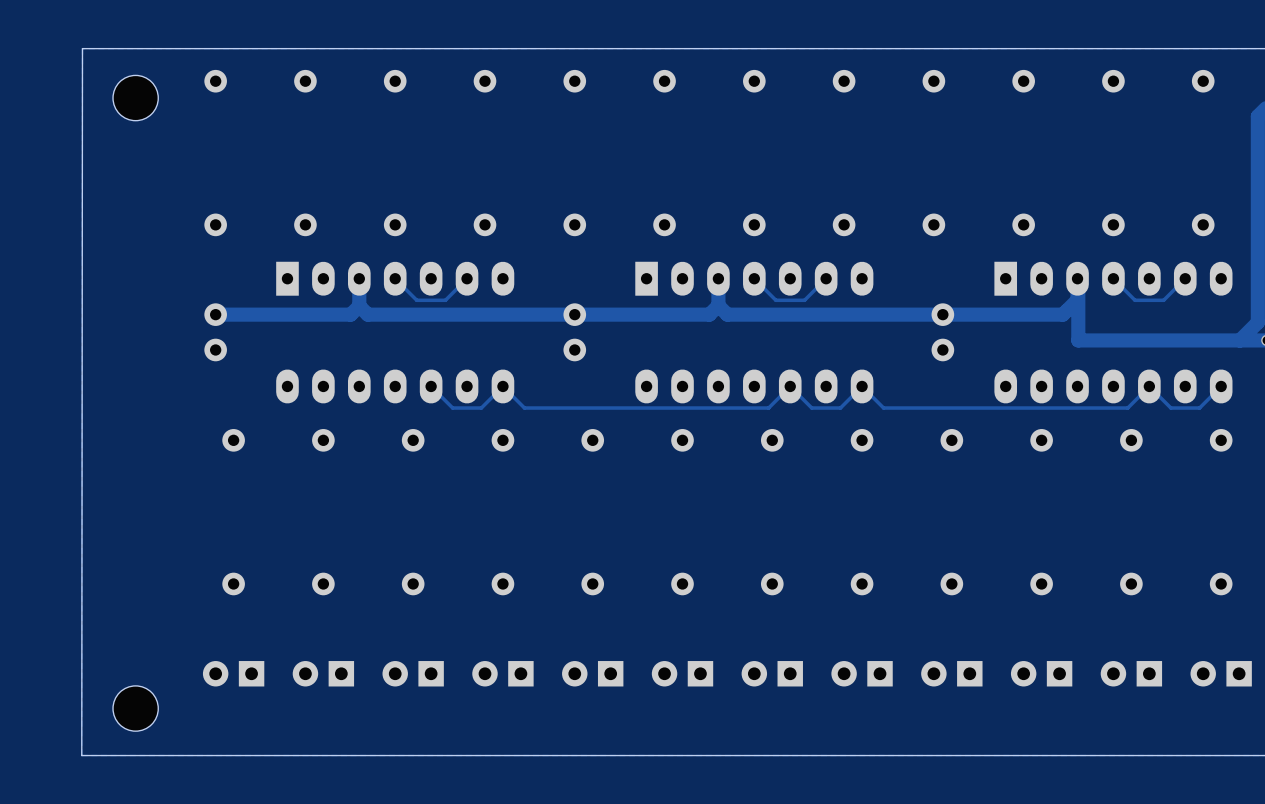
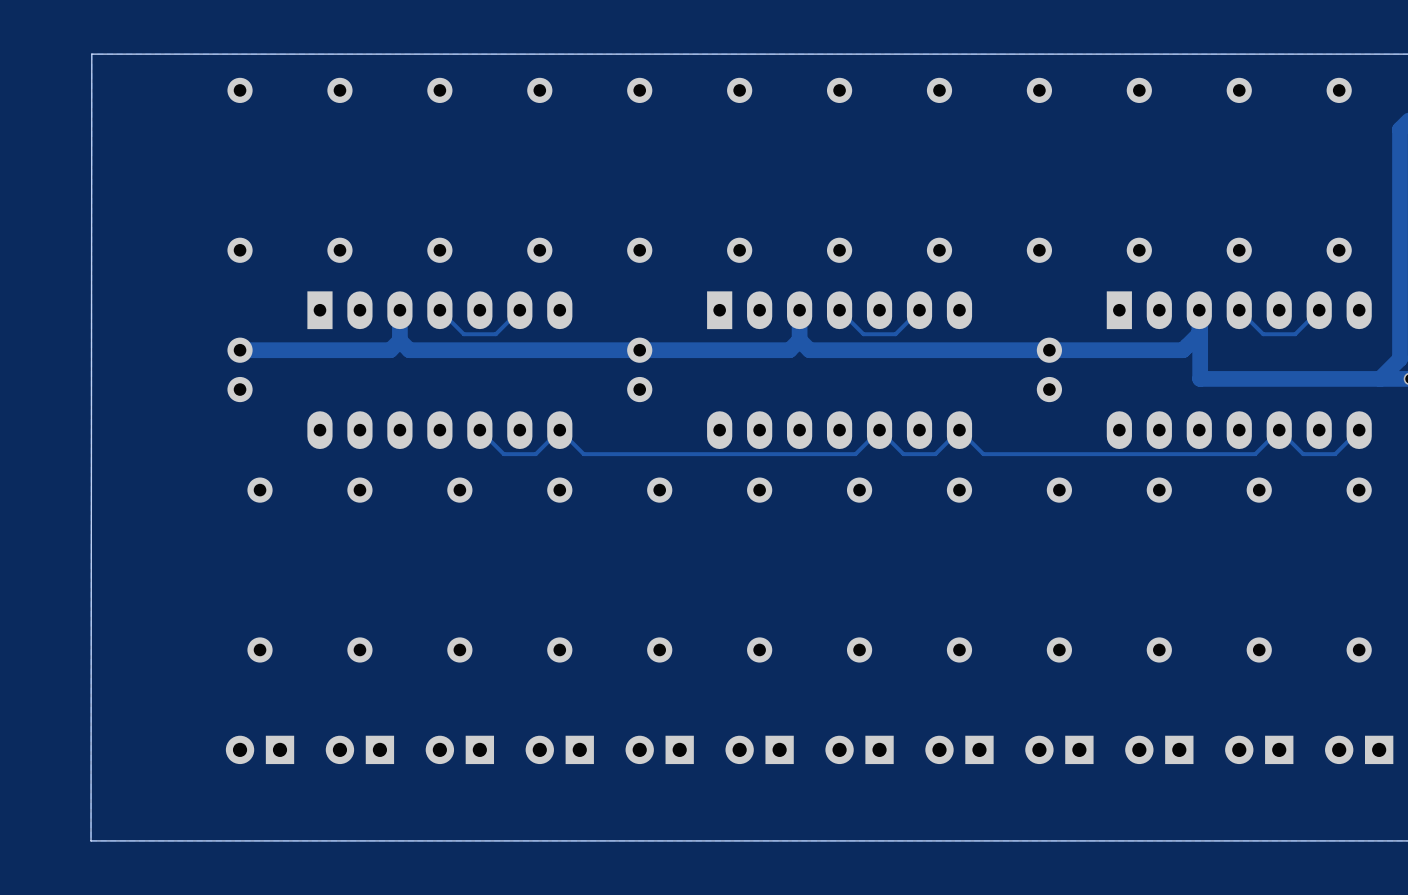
part: (135, 98) -> none
part: (135, 708) -> none

